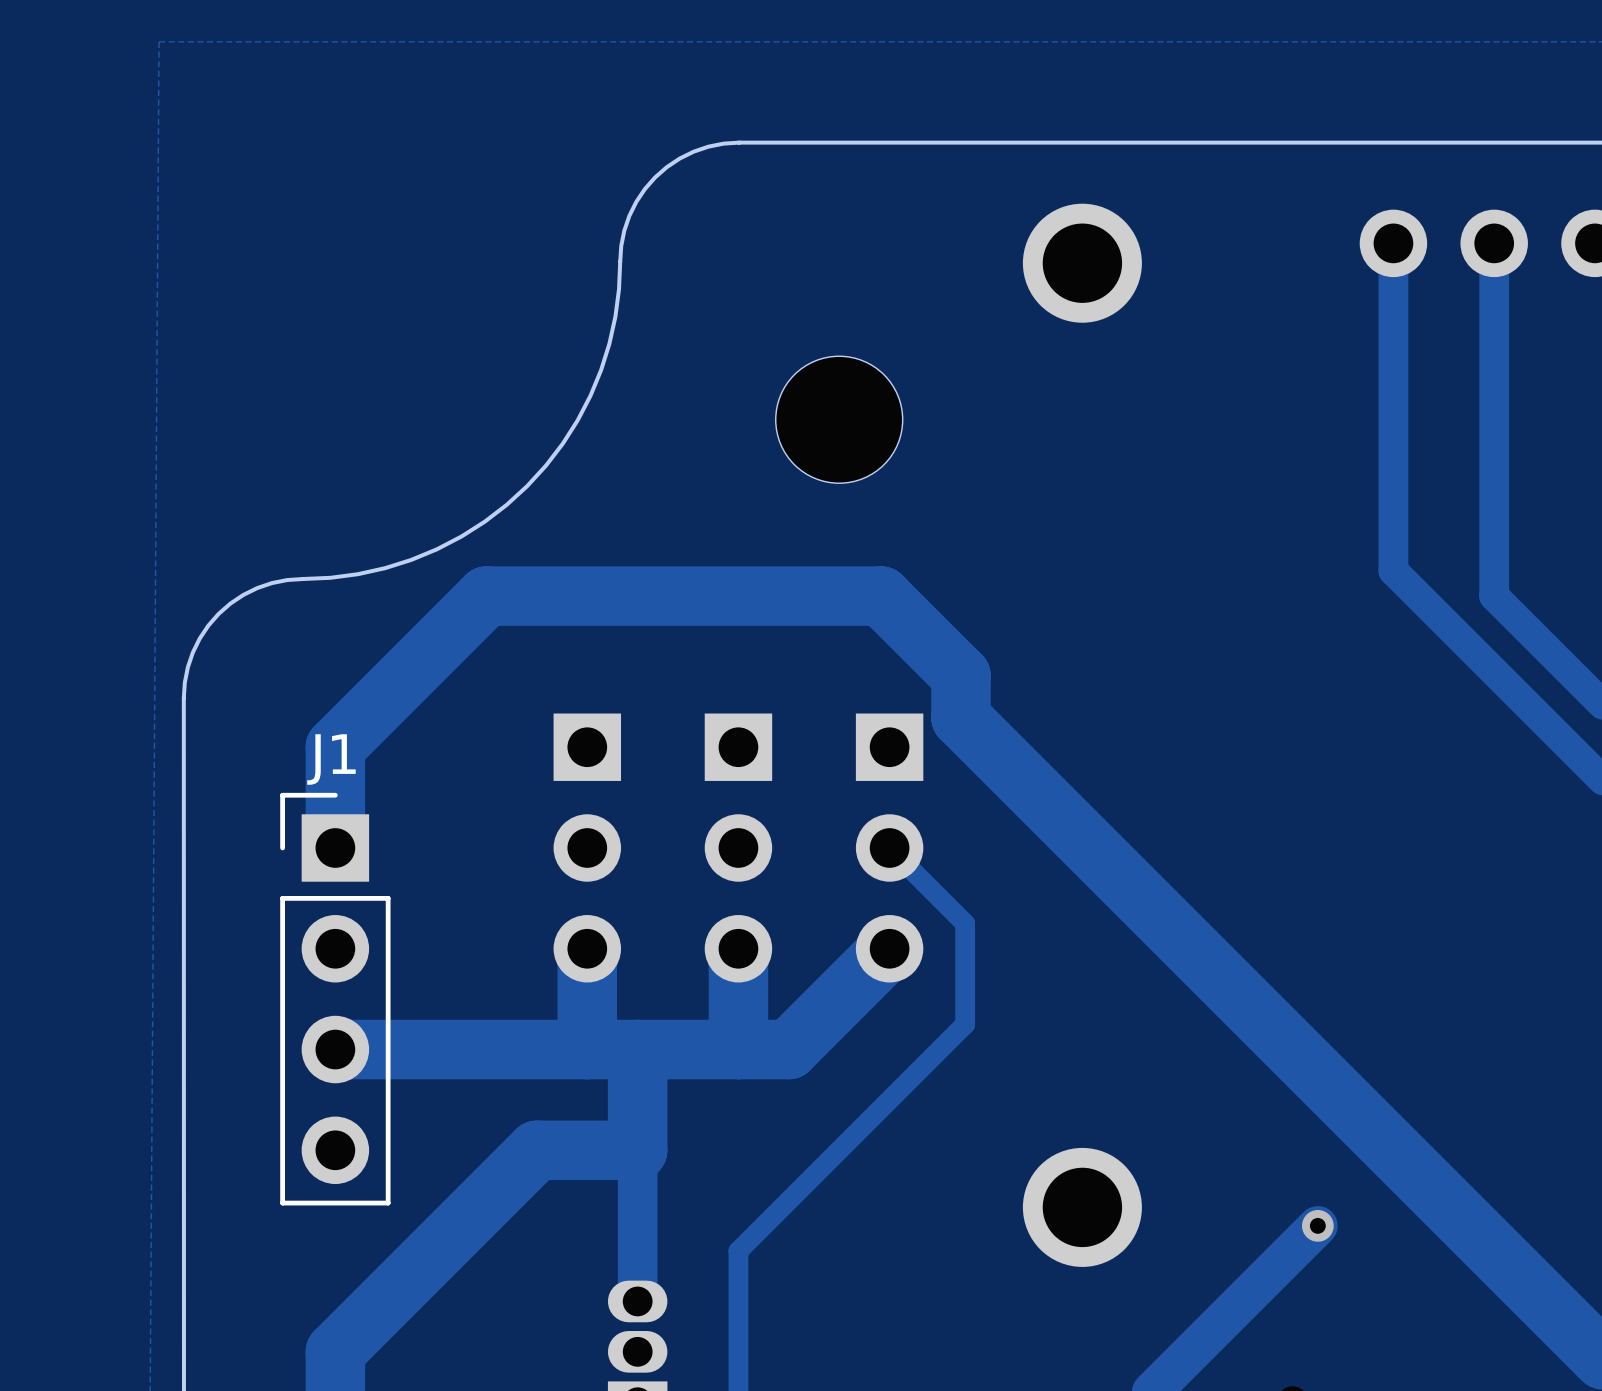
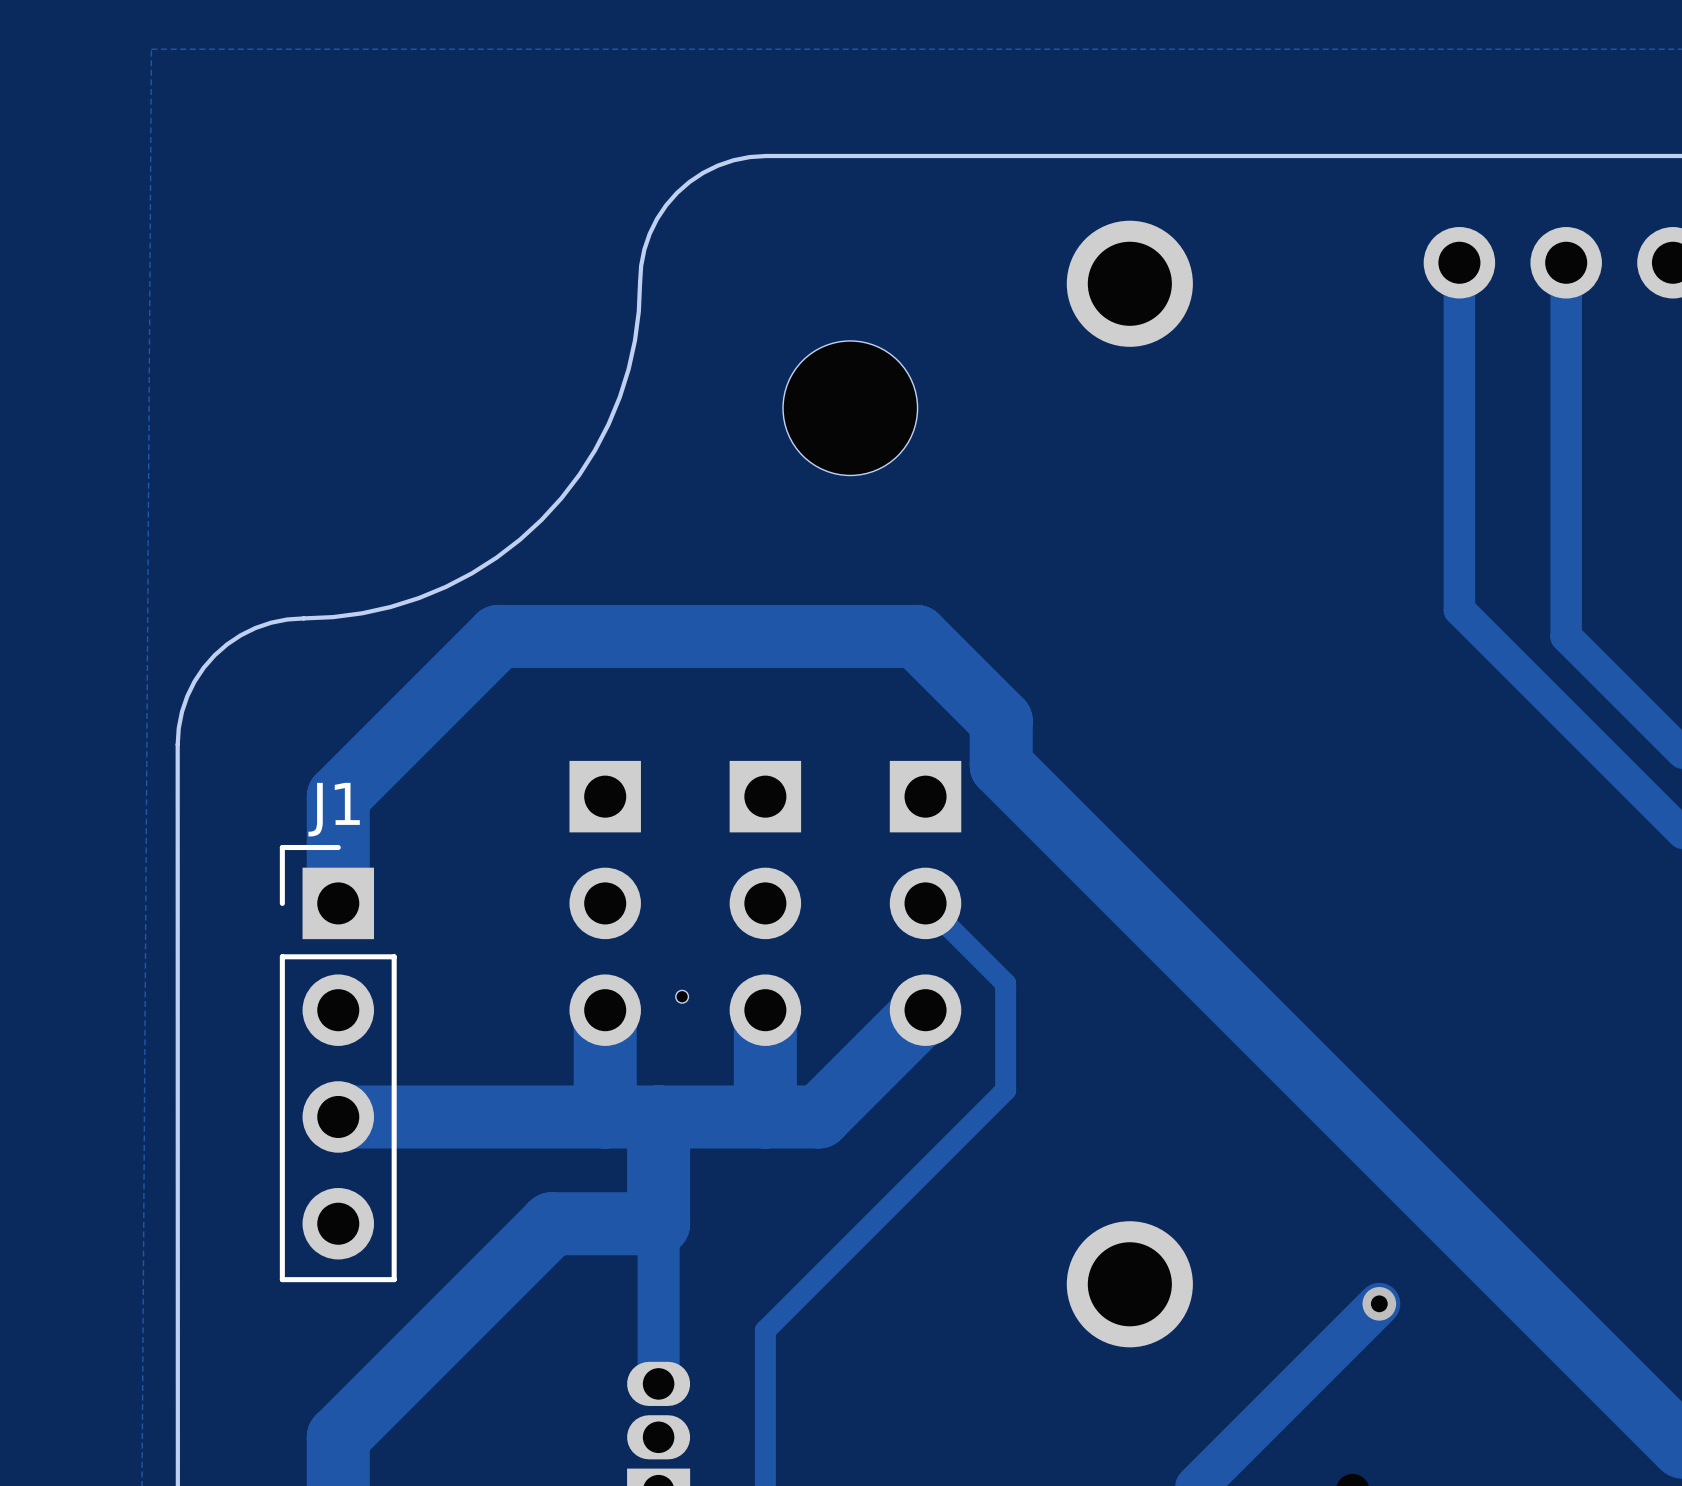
part position: (839, 419) -> (850, 408)
part: none -> (682, 996)

